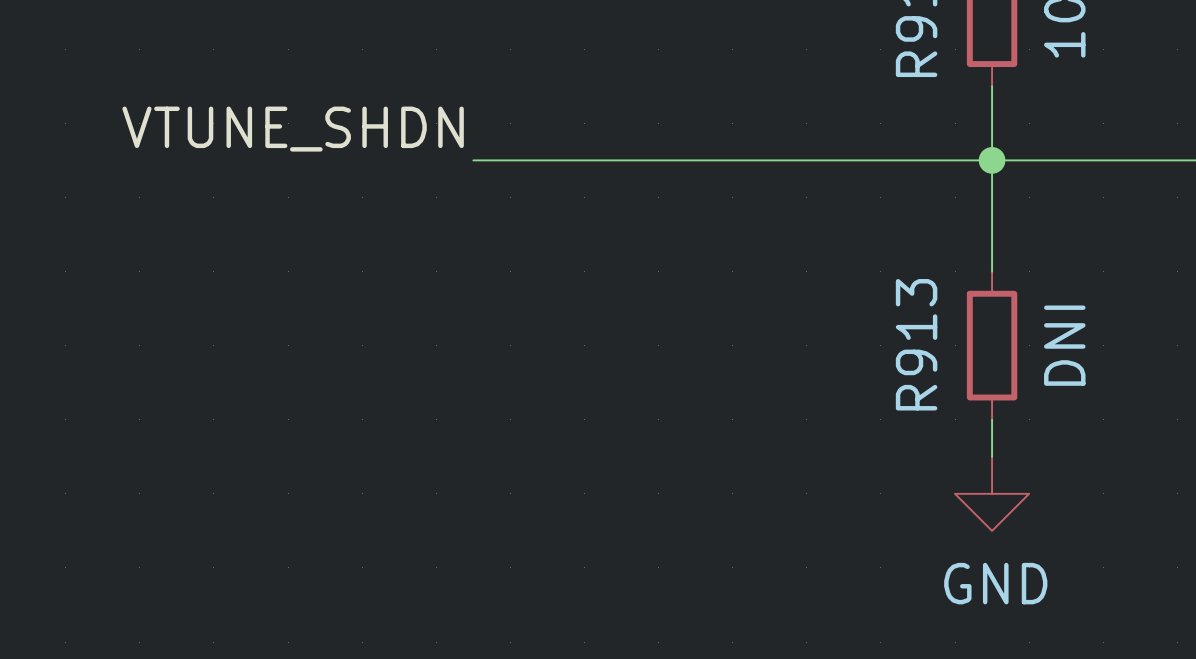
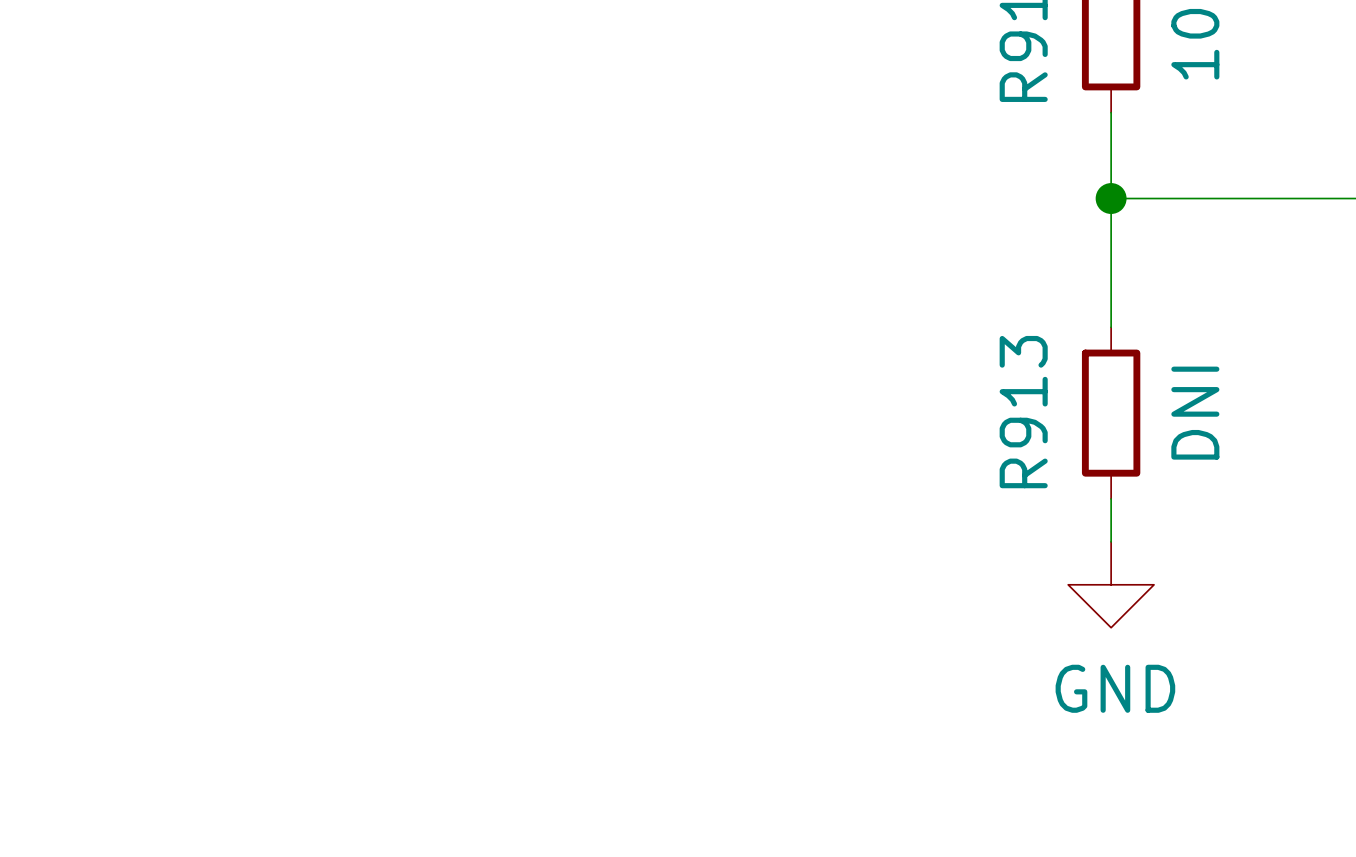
label: VTUNE_SHDN (293, 129) -> none
wire: (473, 160) (992, 160) -> none

